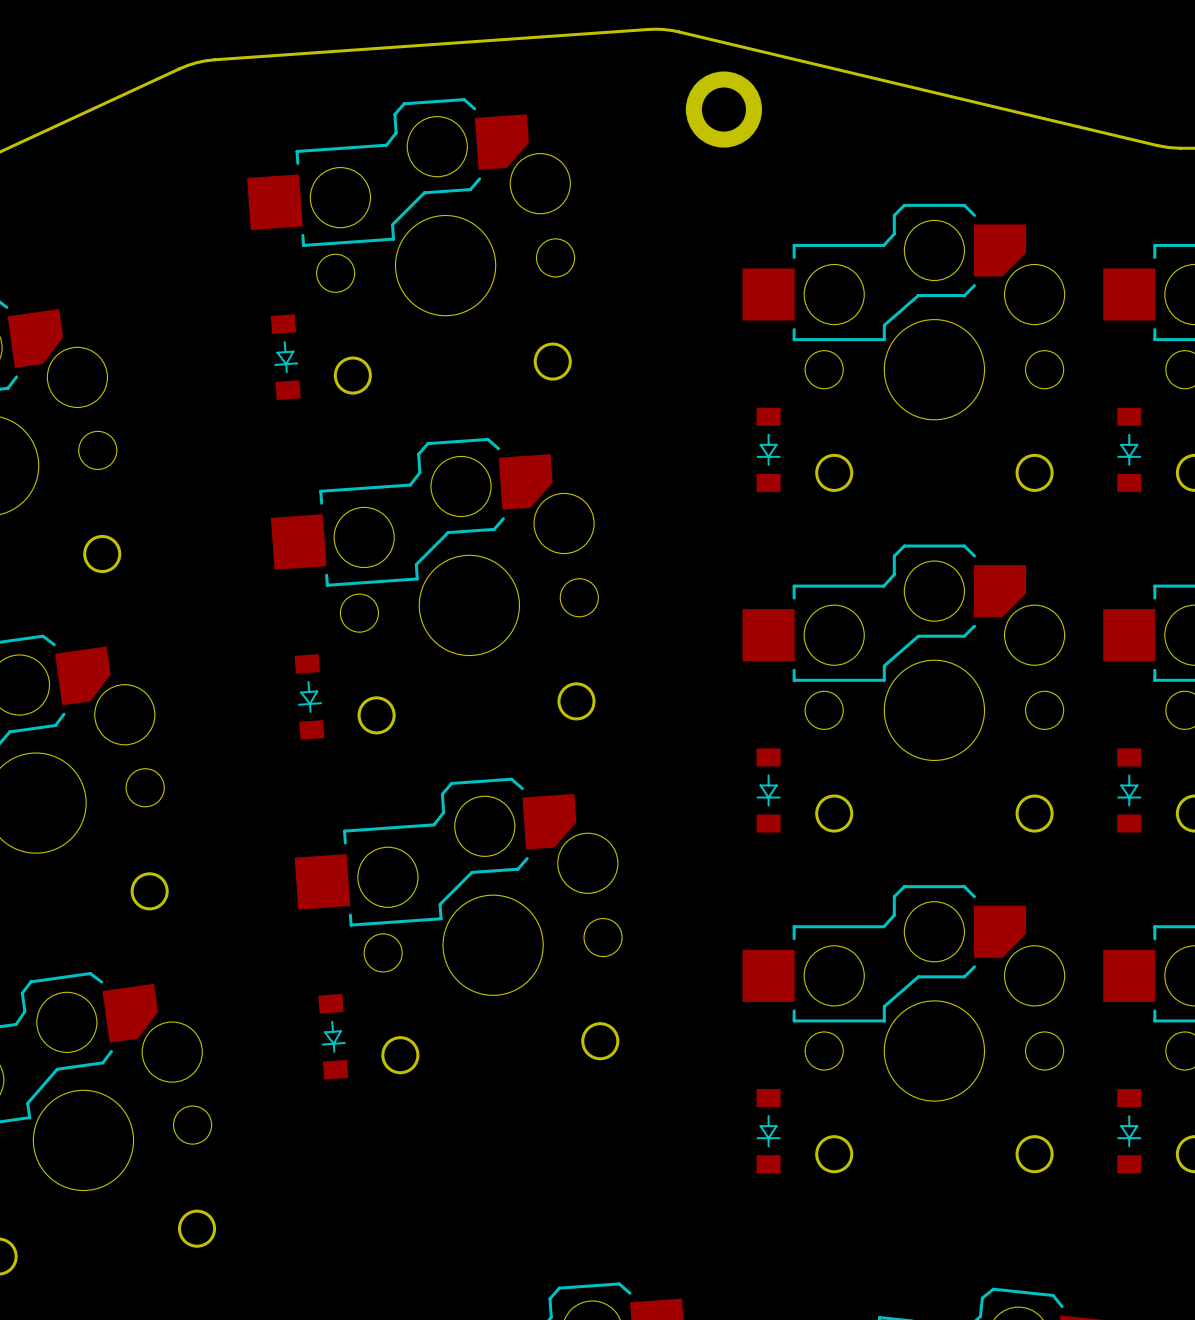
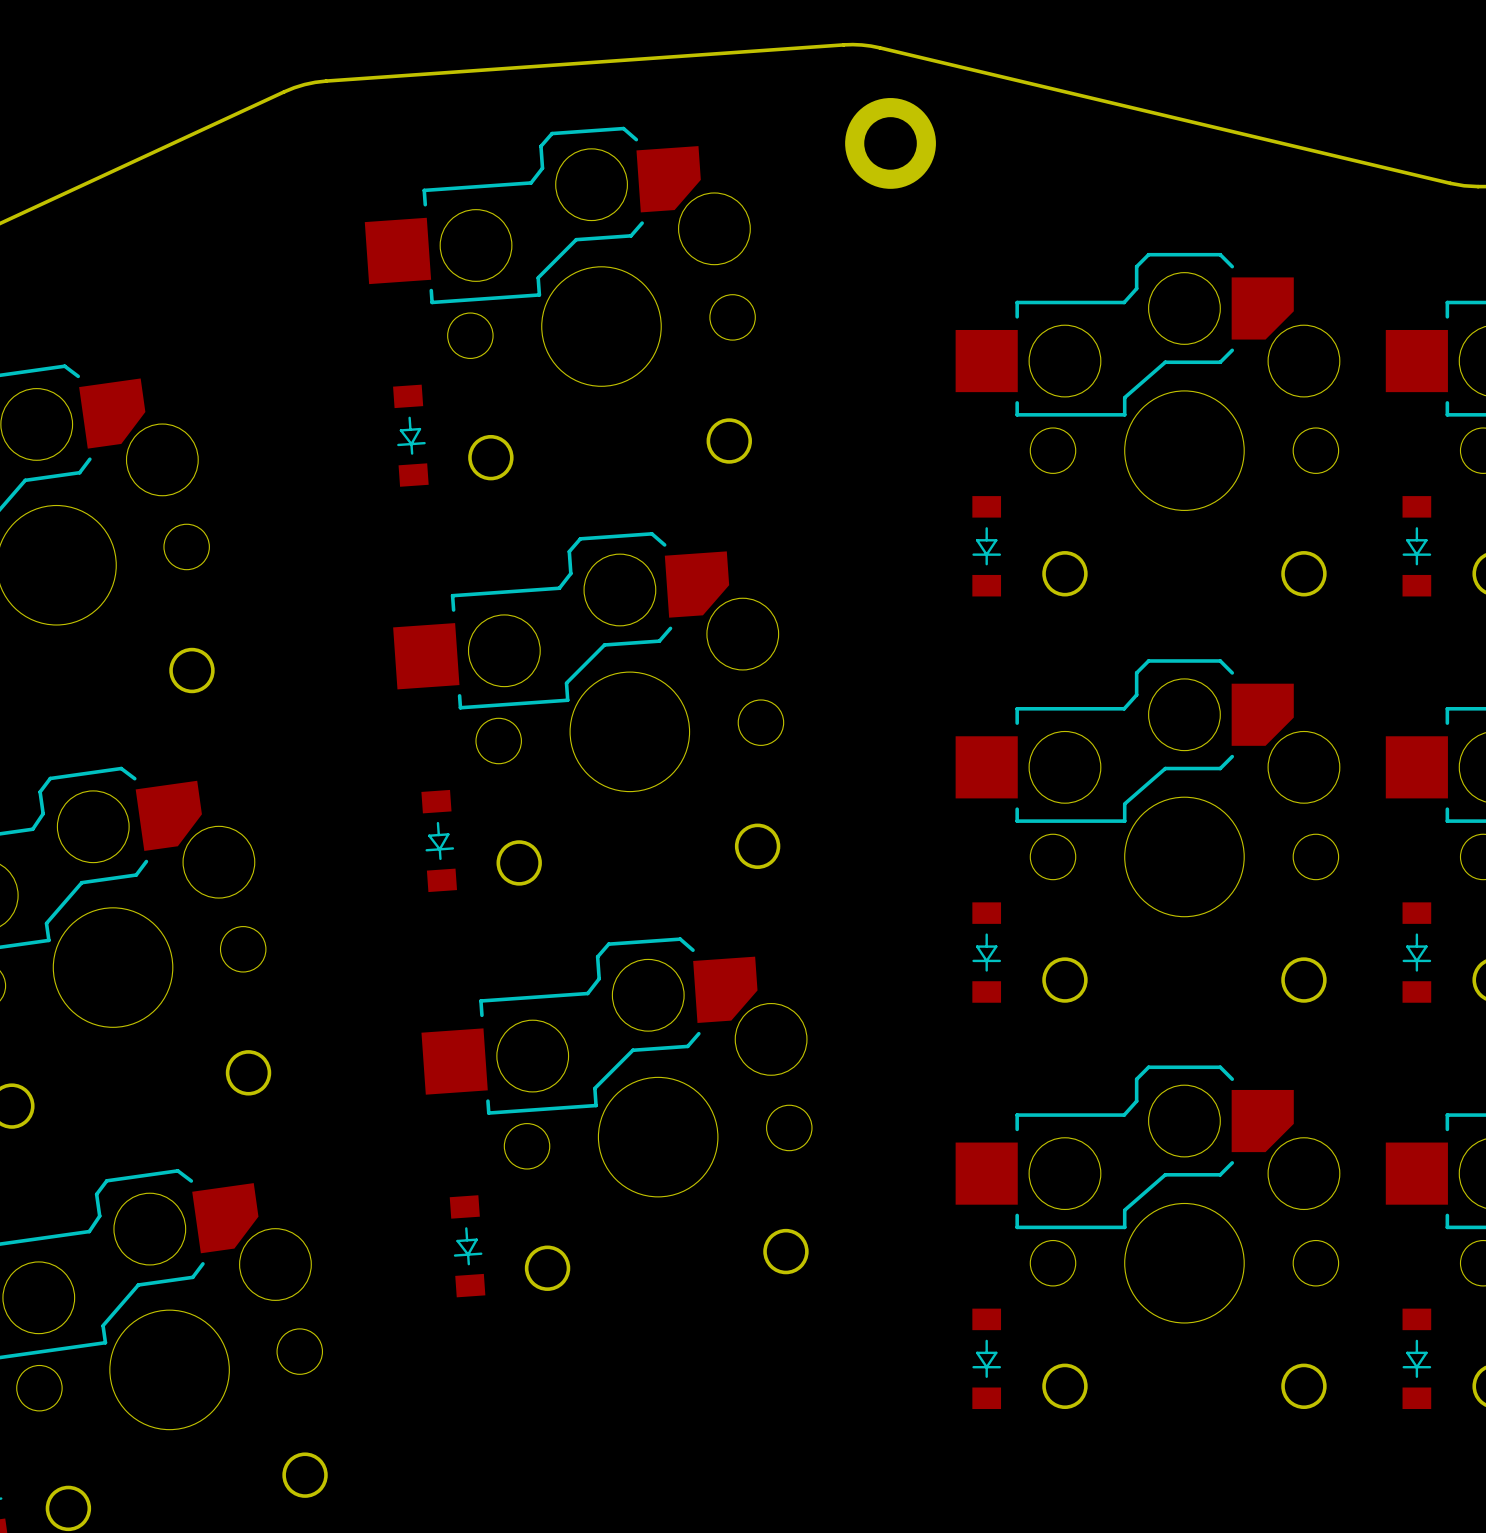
part position: (723, 109) -> (890, 143)

